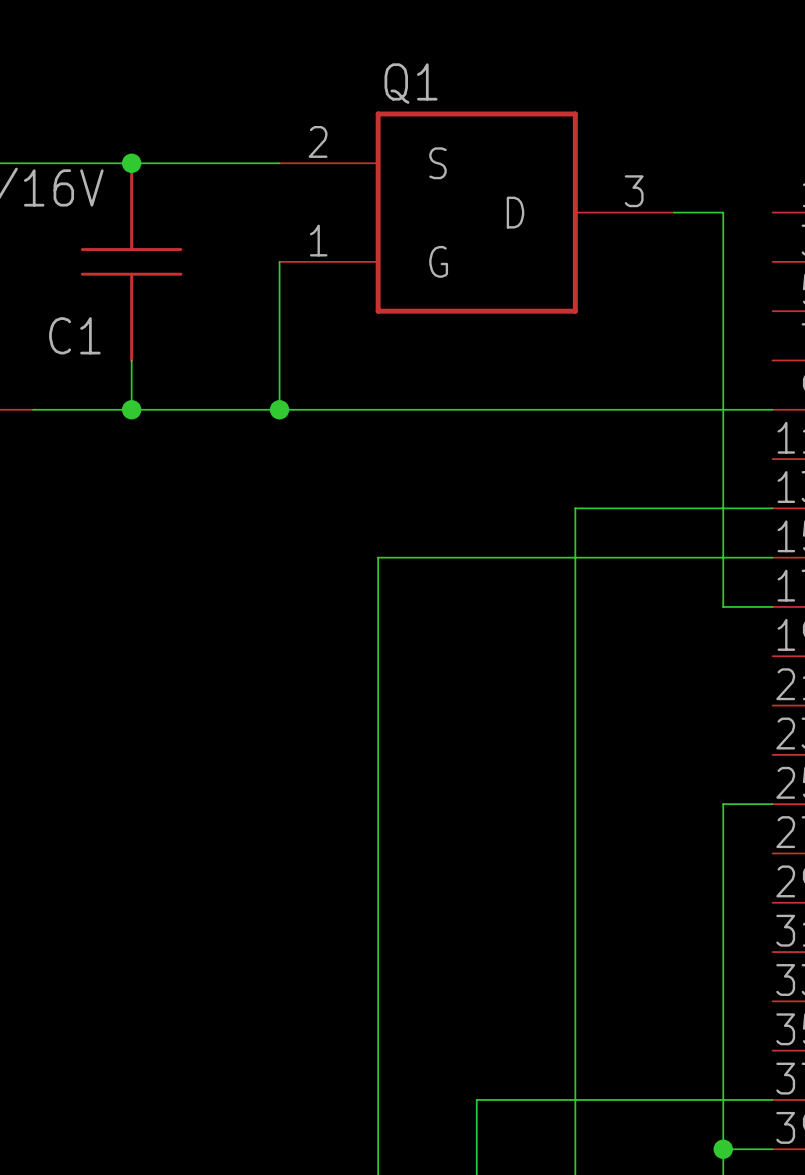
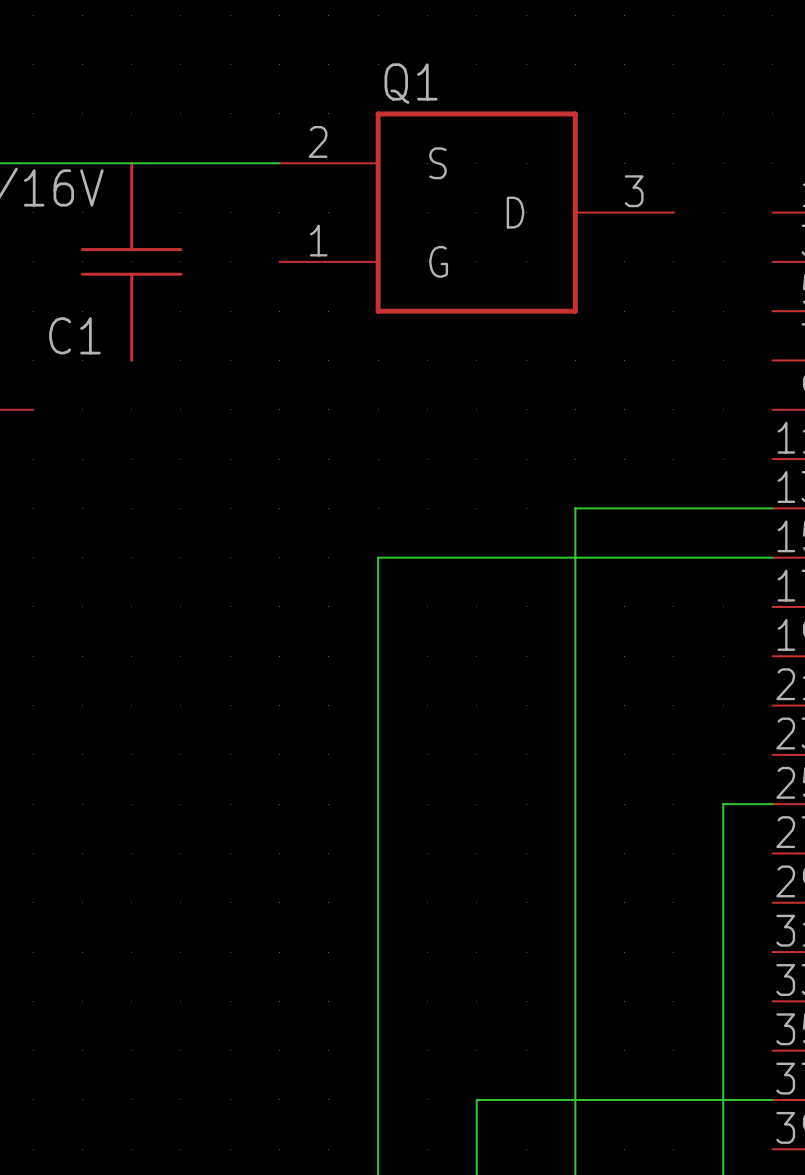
junction: (131, 163) -> none
wire: (673, 212) (723, 212) (723, 606) (772, 606) -> none
wire: (279, 261) (279, 409) -> none
wire: (131, 360) (131, 409) -> none
wire: (33, 409) (772, 409) -> none
junction: (131, 409) -> none
junction: (279, 409) -> none
wire: (723, 1149) (772, 1149) -> none
junction: (723, 1149) -> none

